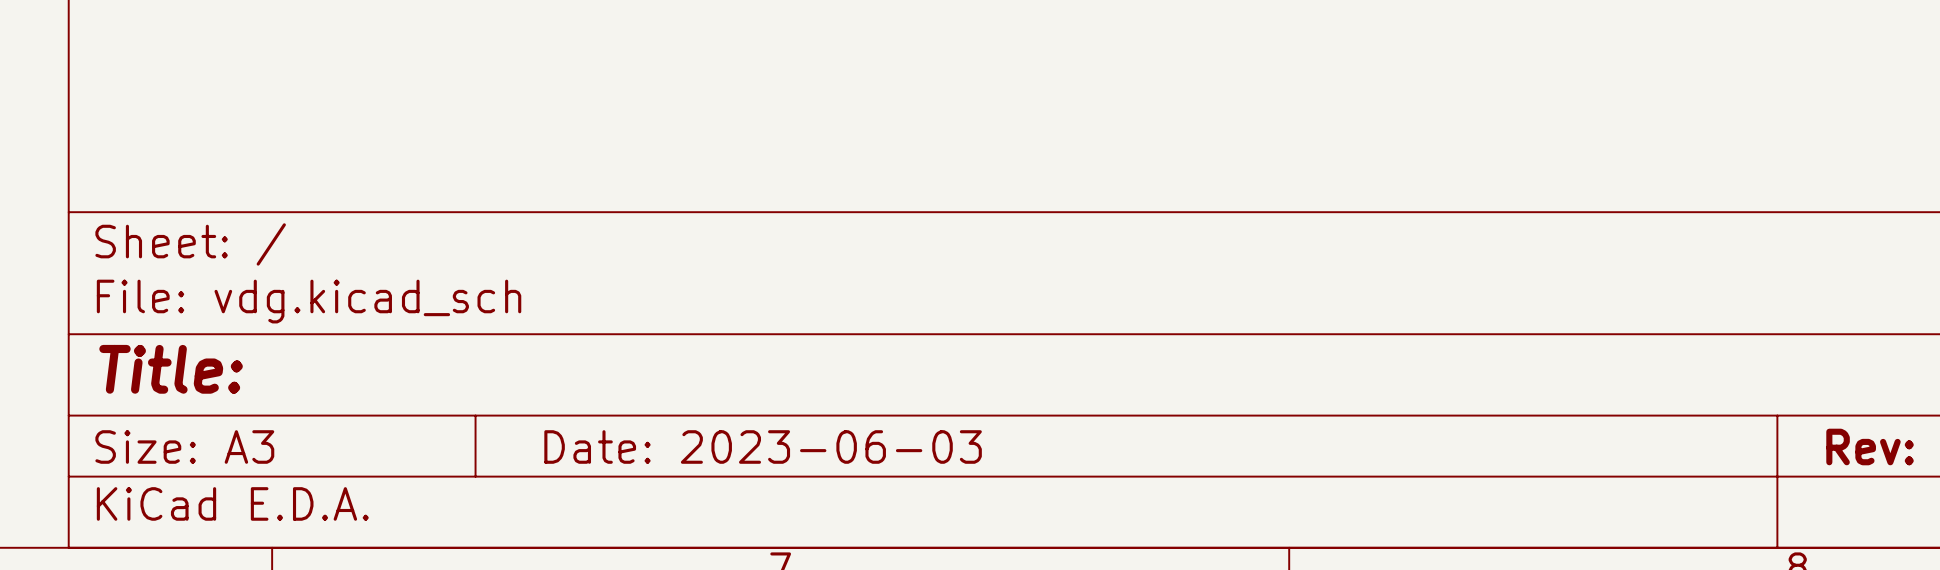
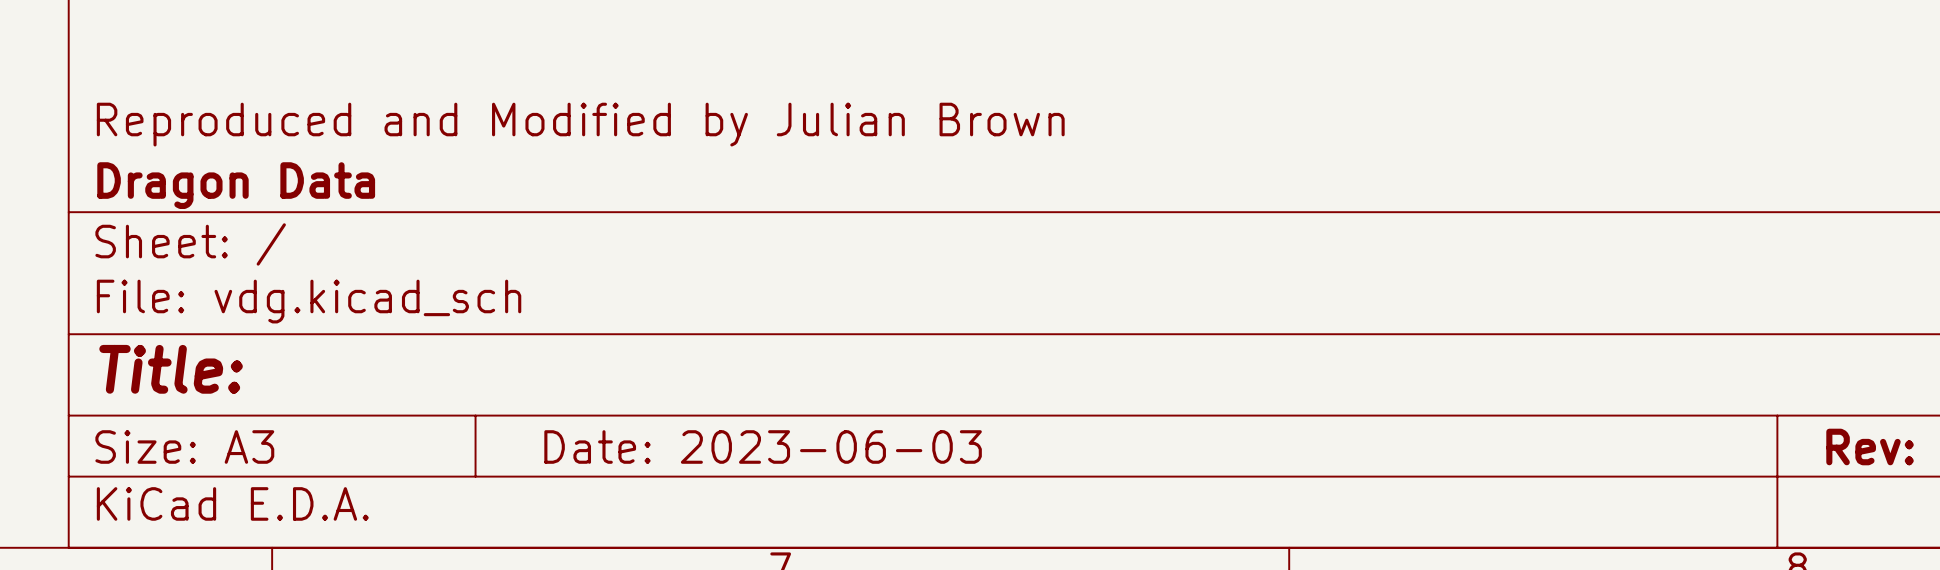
title block: none -> Reproduced and Modified by Julian Brown (580, 124)
title block: none -> Dragon Data (236, 185)

